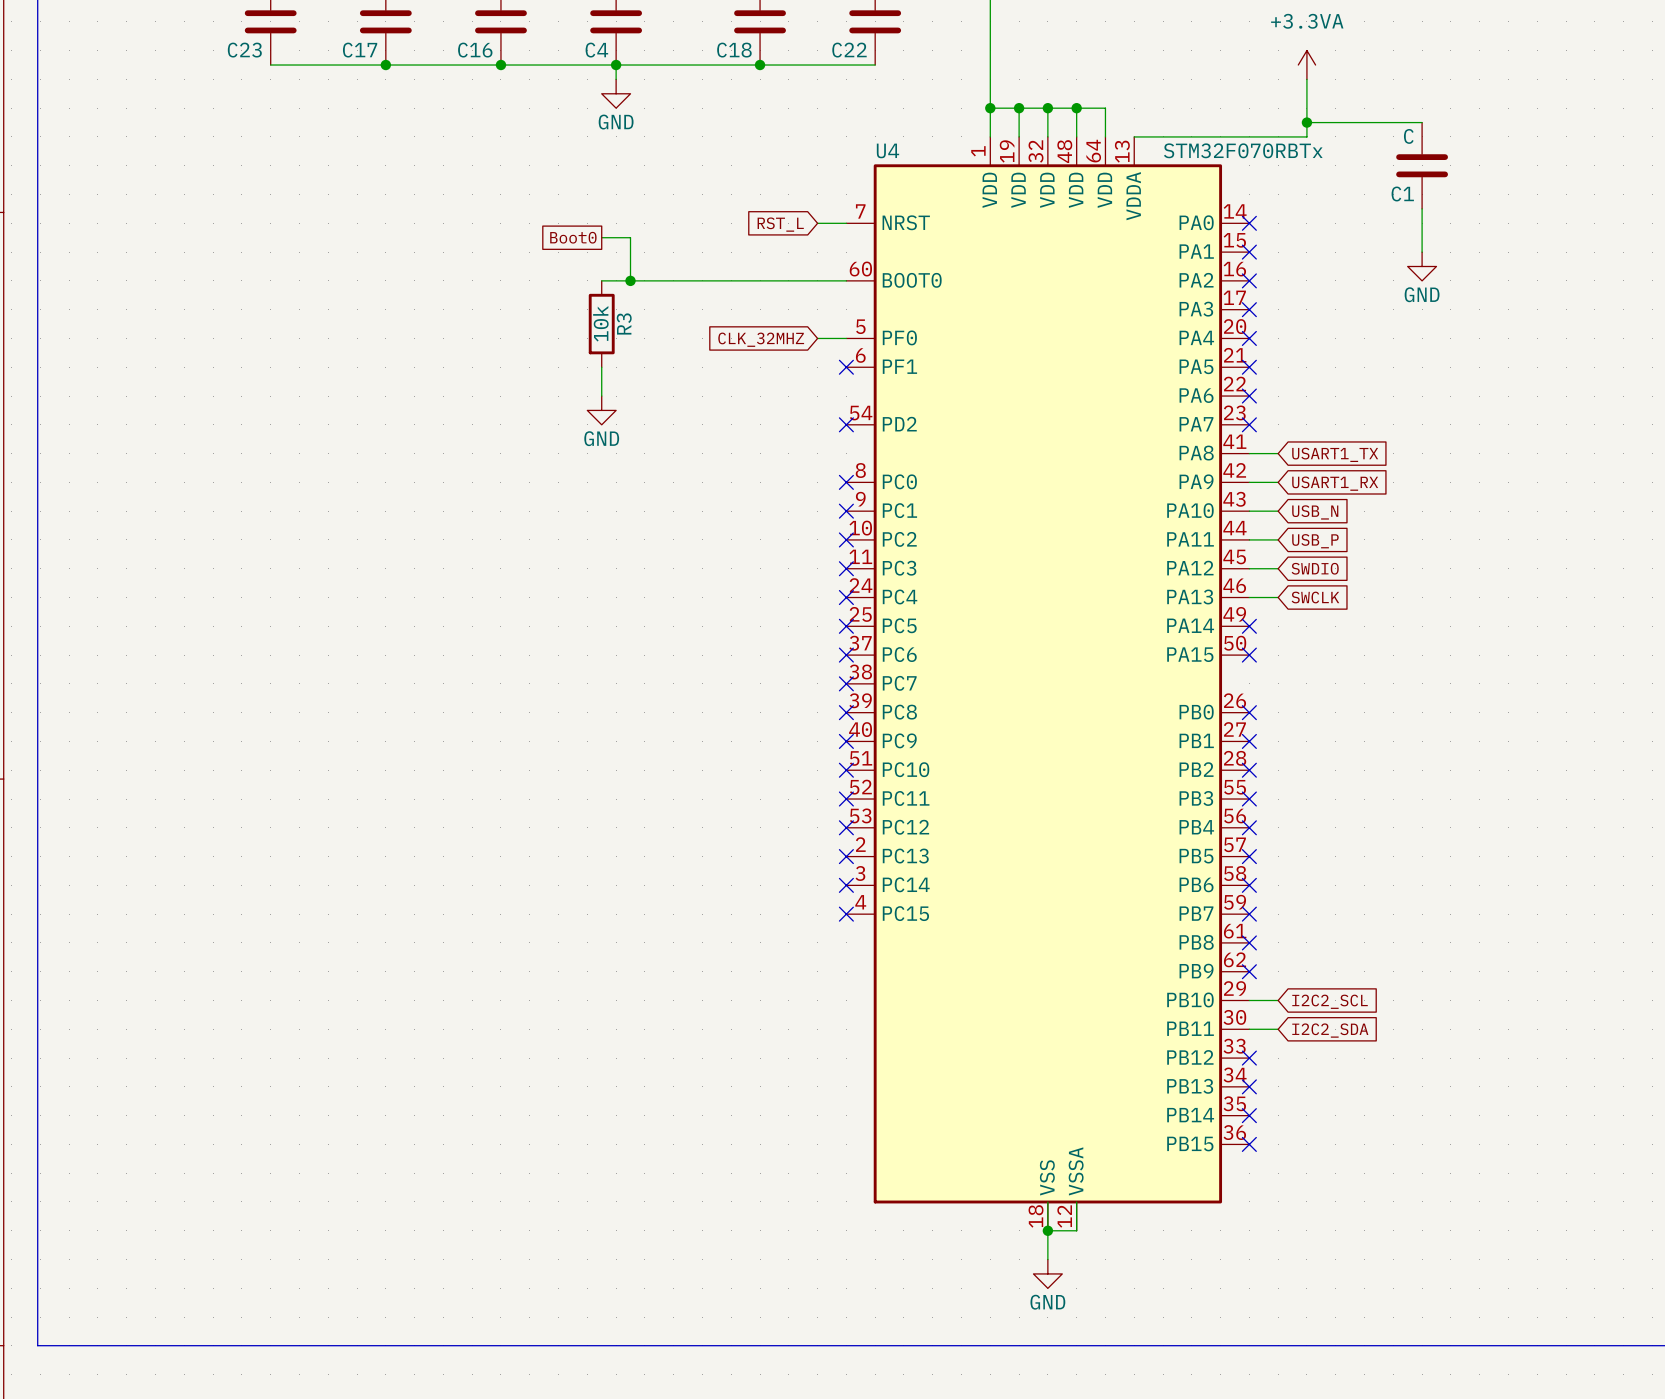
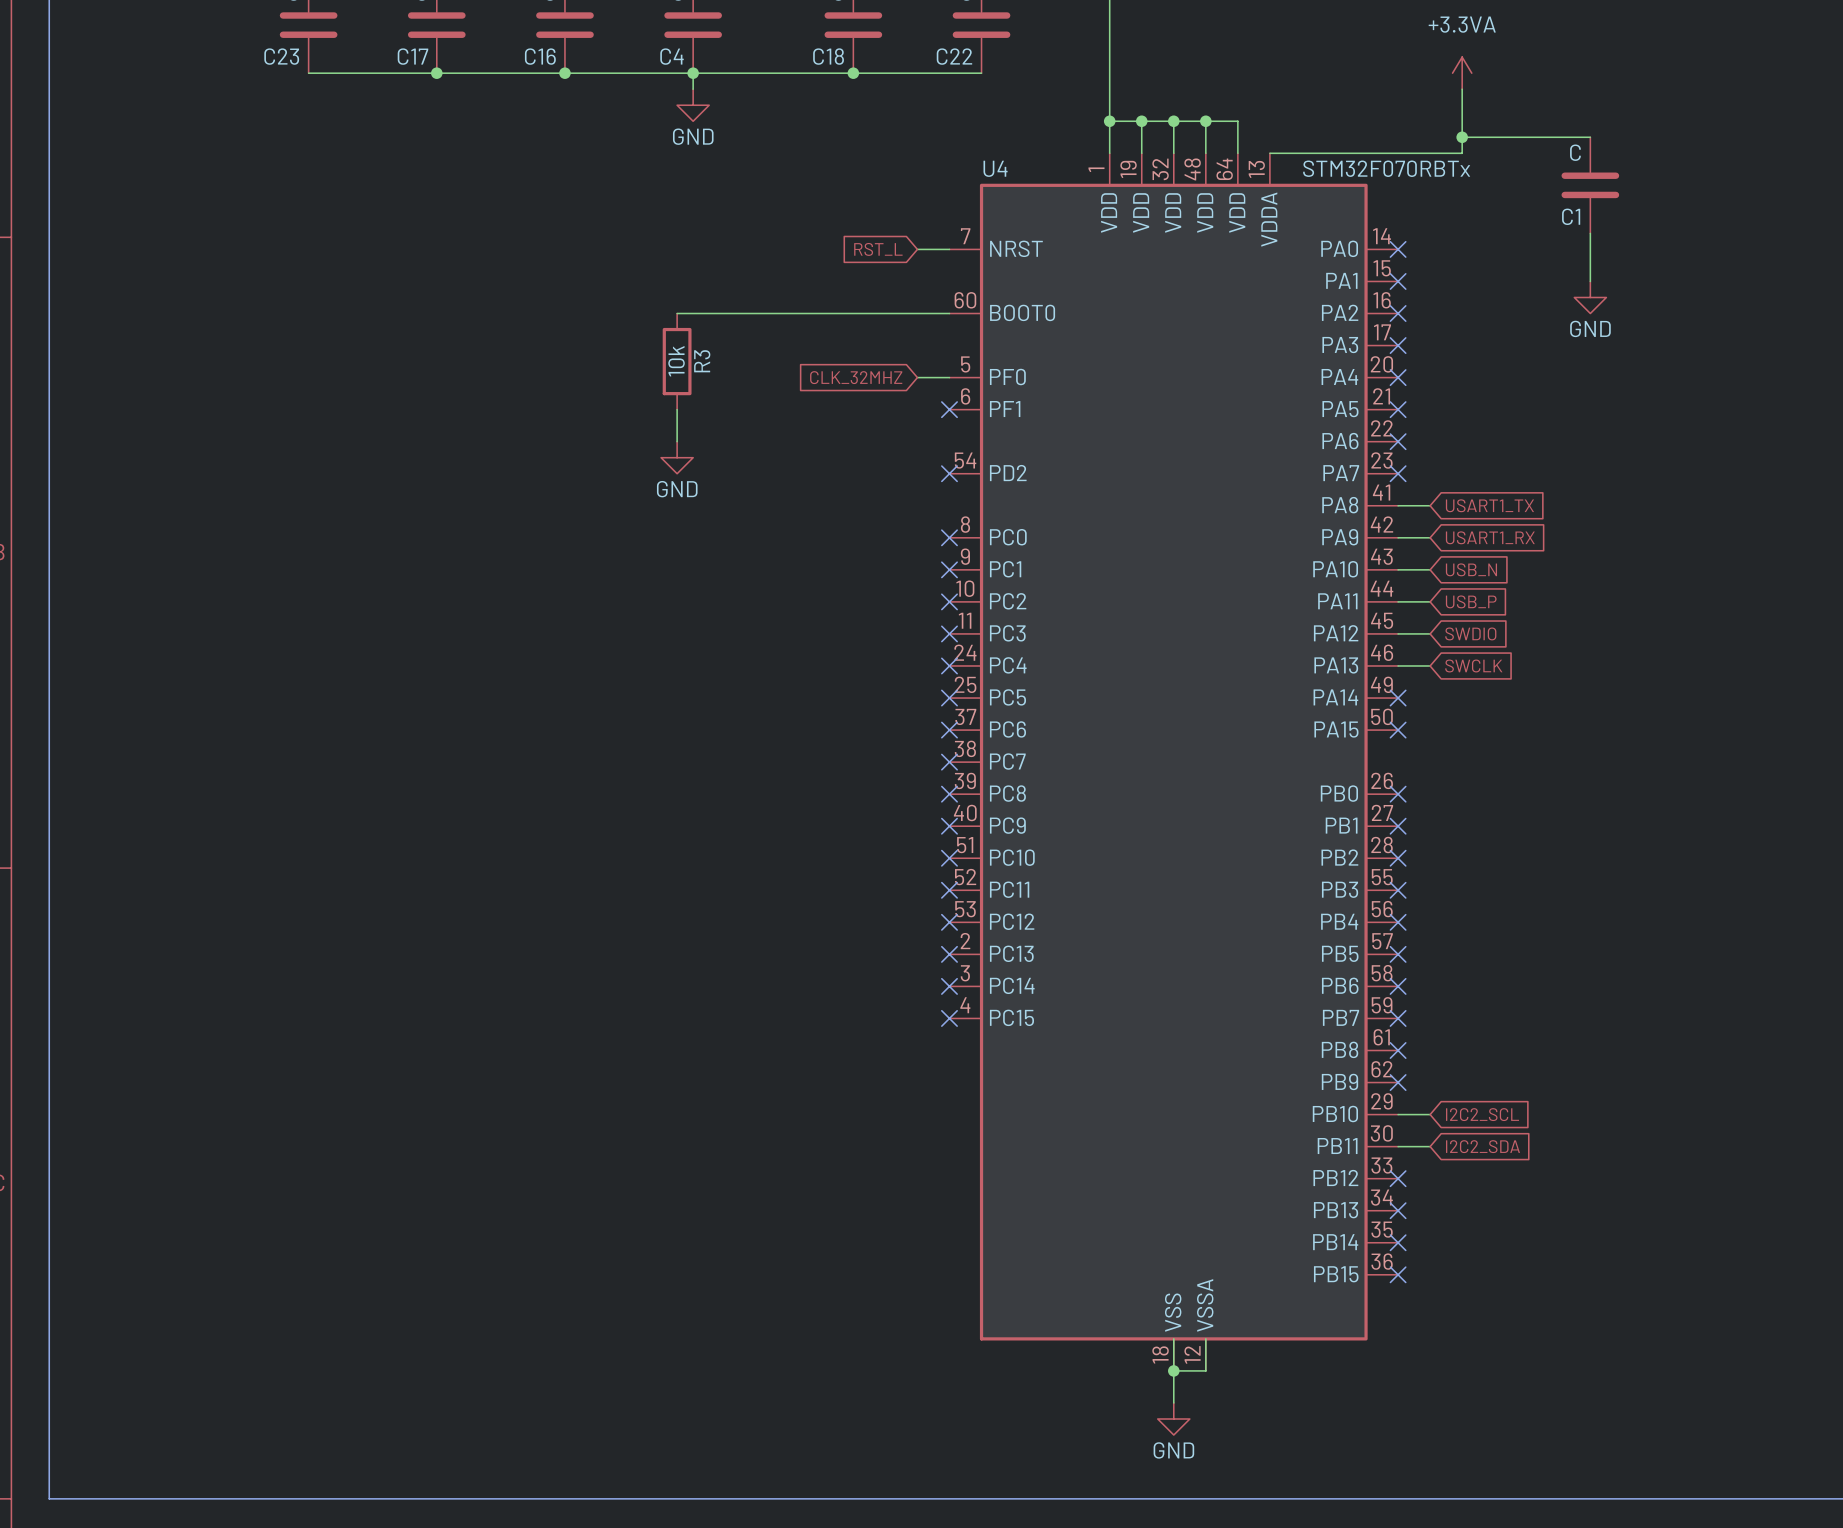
global label: Boot0 (573, 237) -> none
wire: (601, 237) (630, 237) (630, 280) -> none
junction: (630, 280) -> none

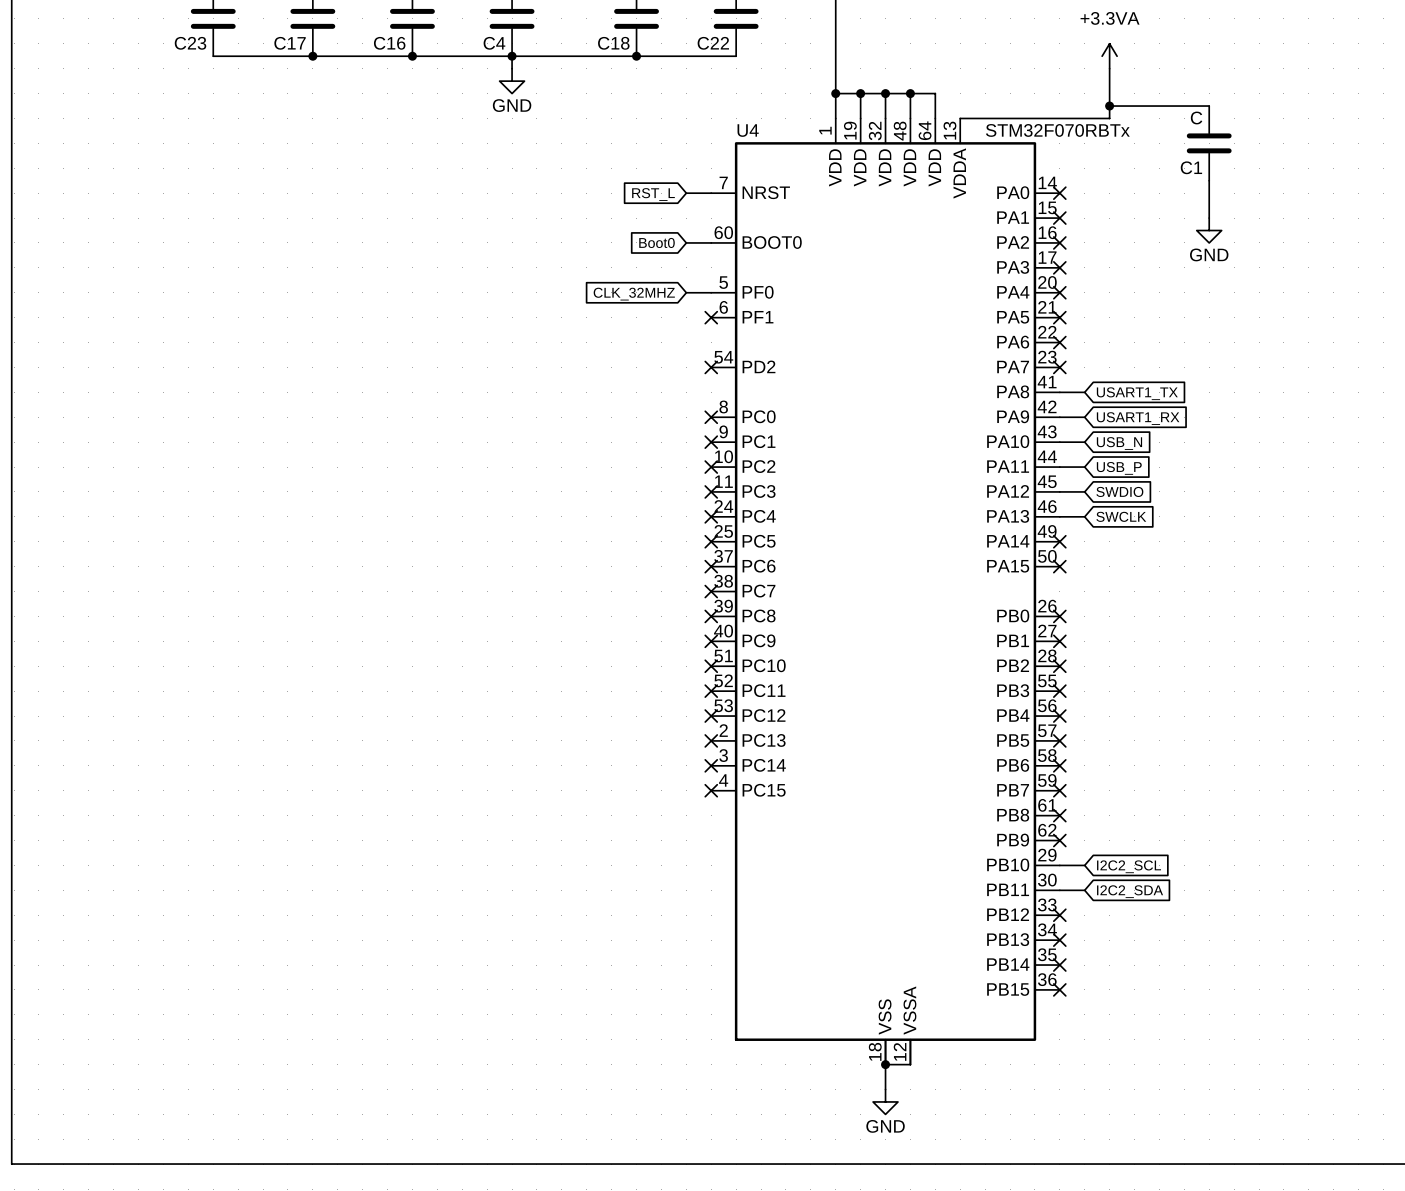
wire: (677, 313) (917, 313) -> none
global label: none -> Boot0 (657, 242)
R3: 10k (677, 361) -> none
wire: (677, 409) (677, 441) -> none
power symbol: GND (677, 457) -> none

